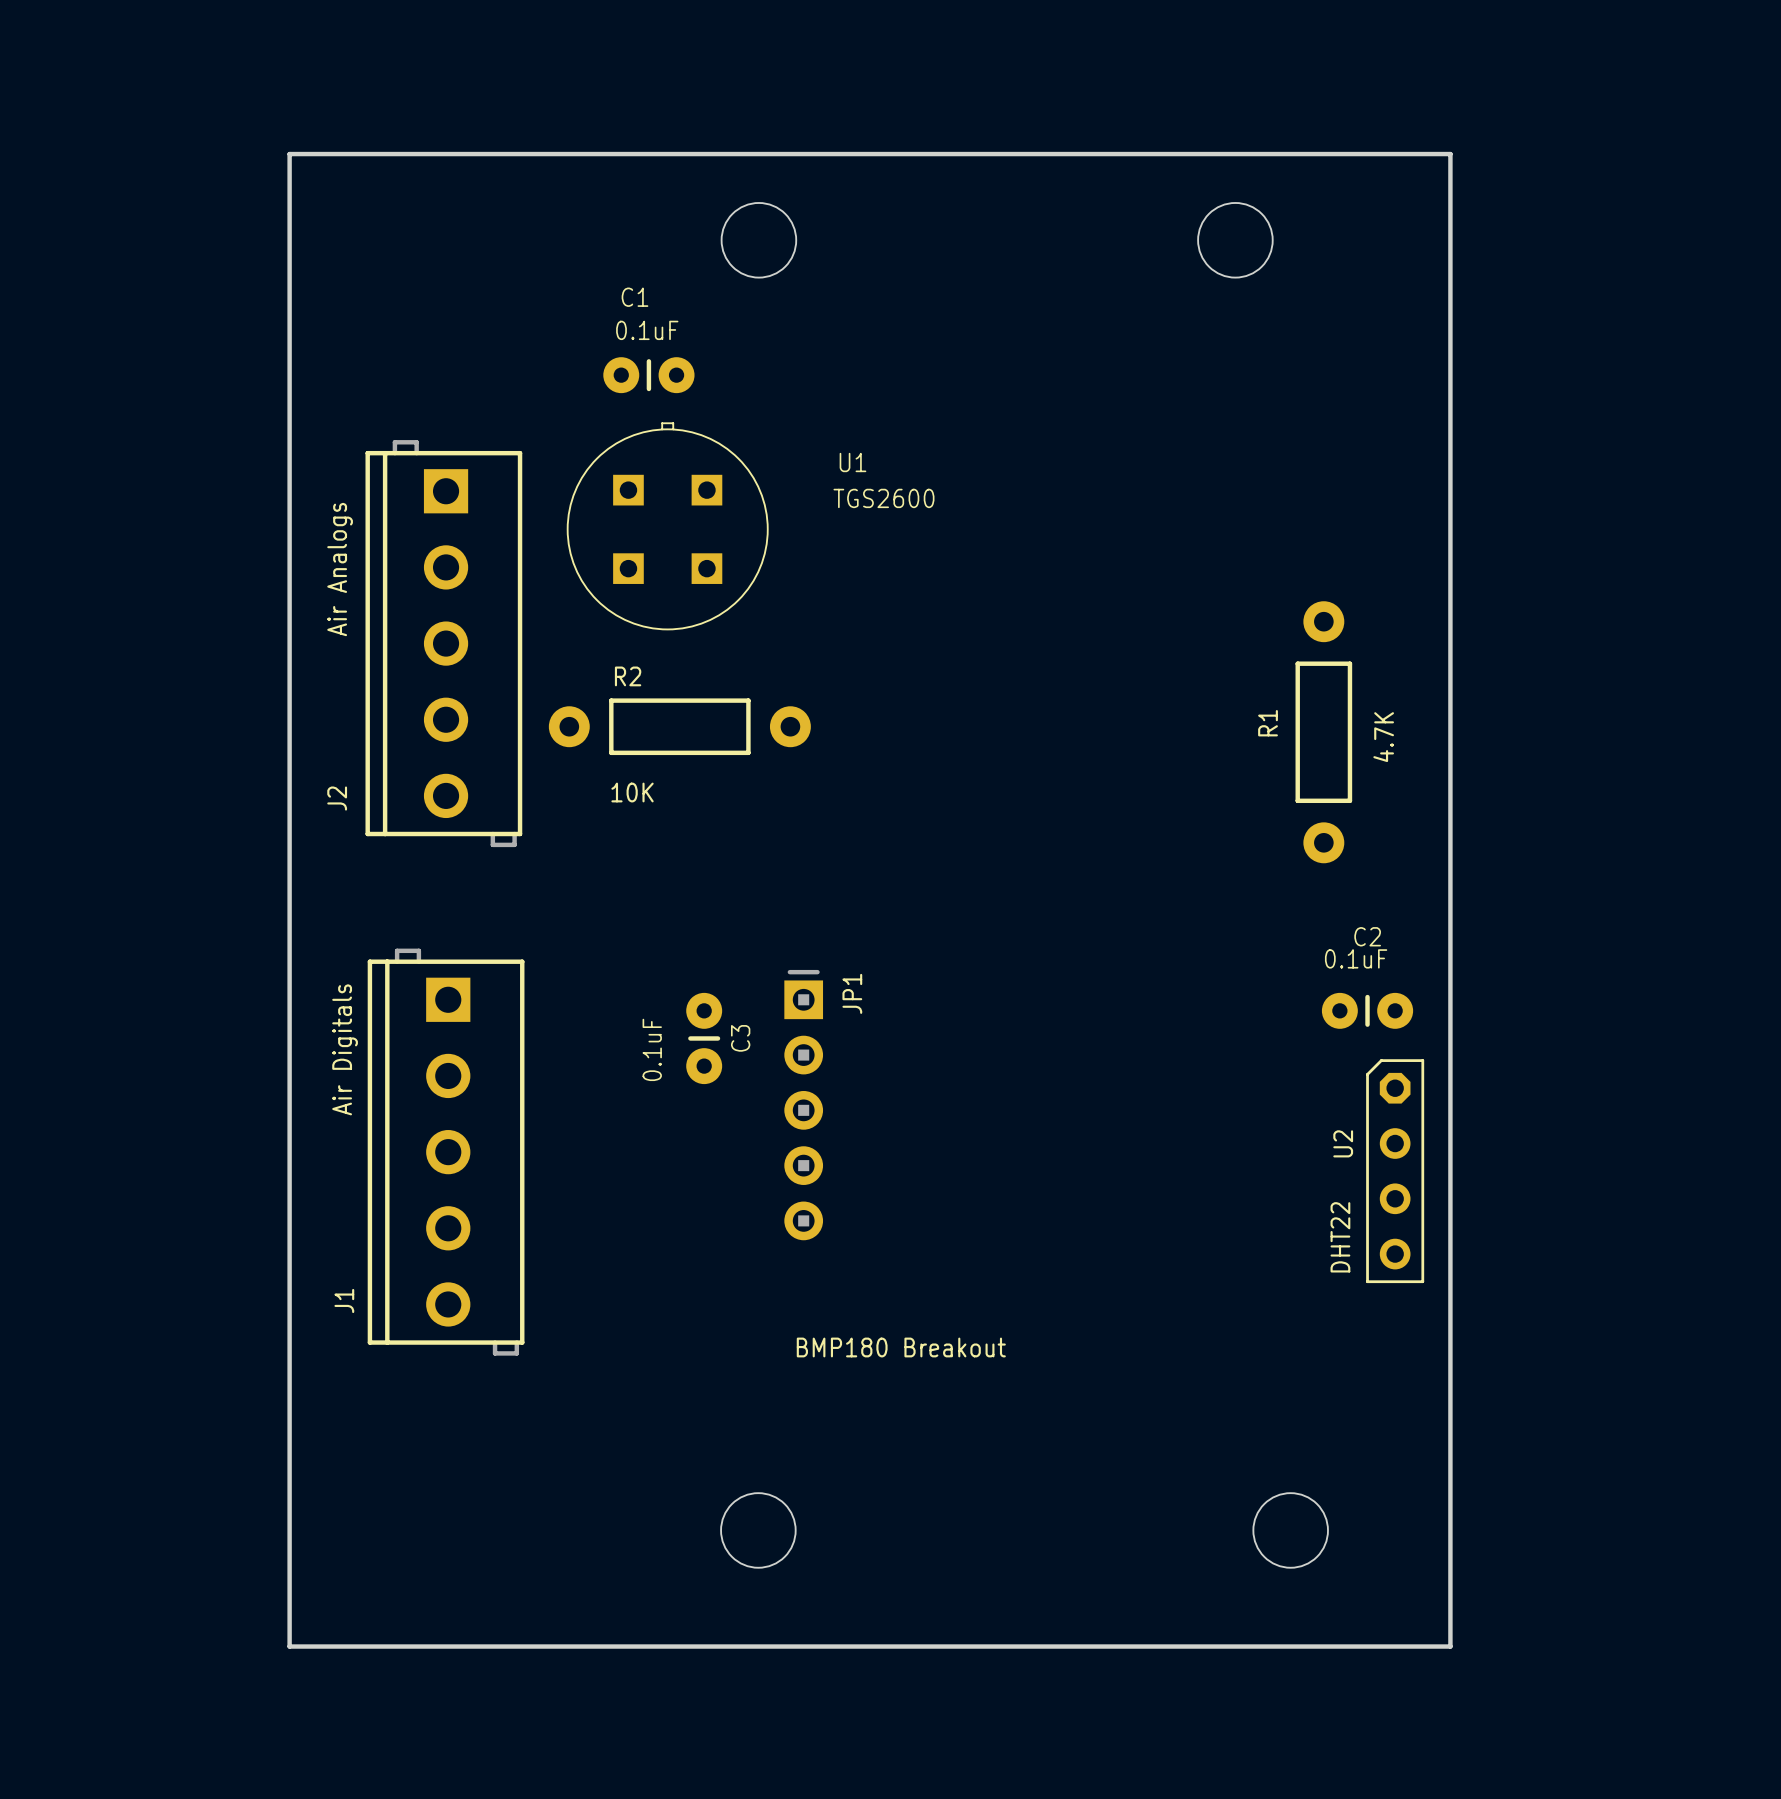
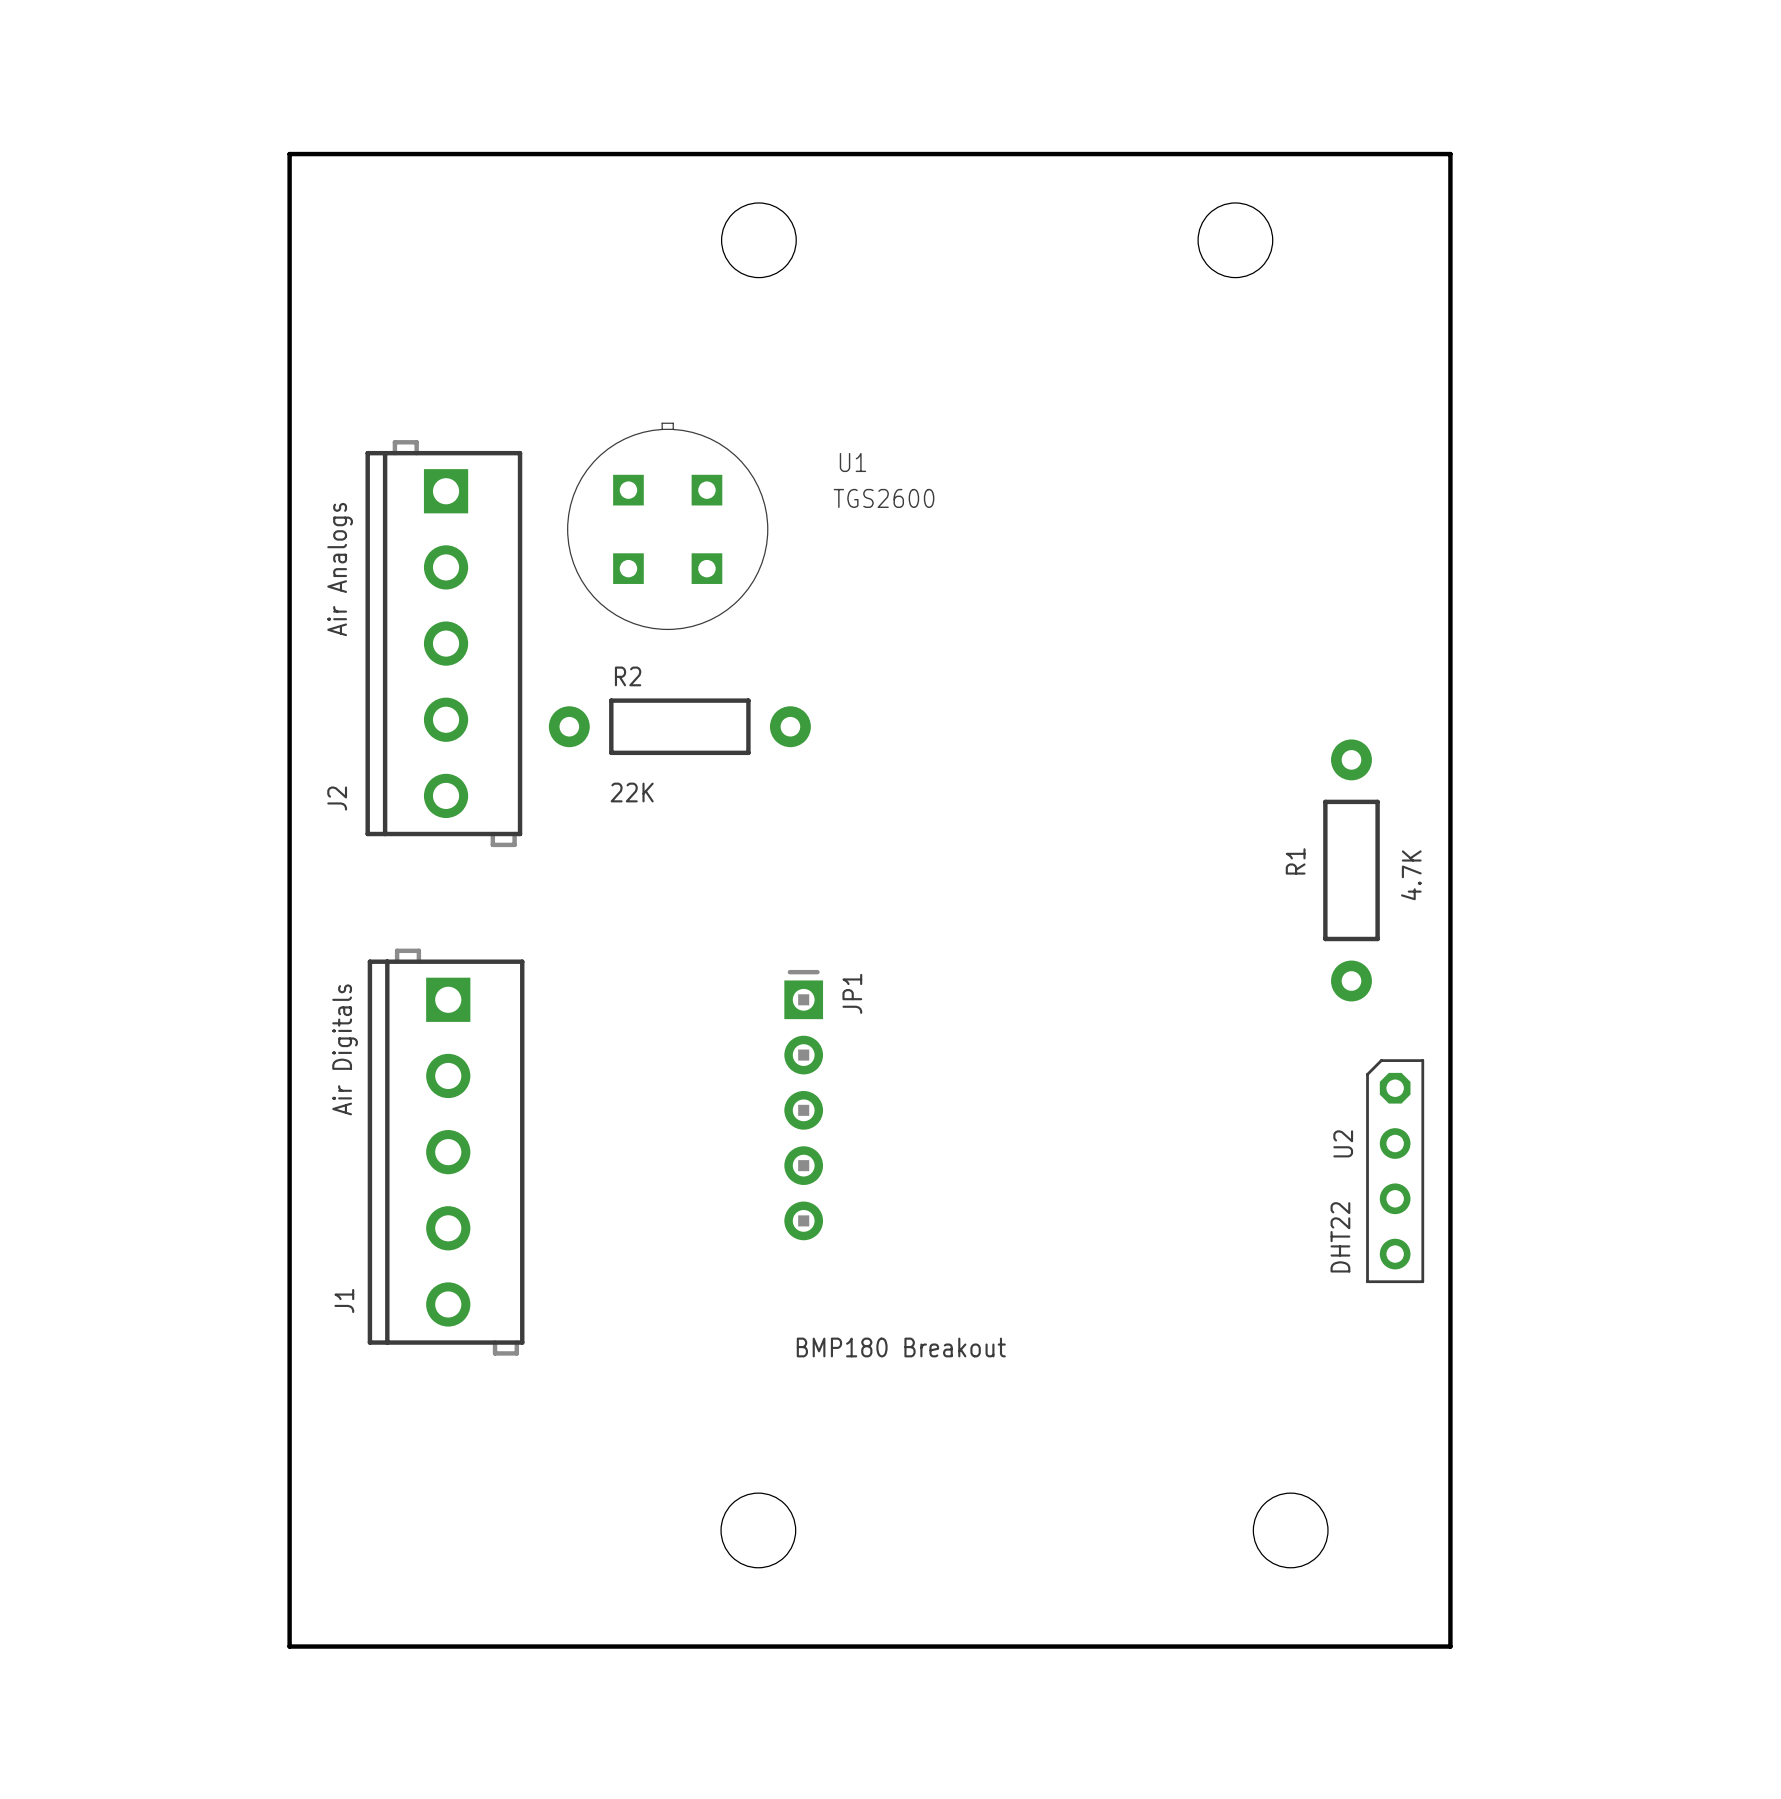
C1: 0.1uF (648, 375) -> none
R1 position: (1323, 732) -> (1351, 870)
R2 value: 10K (632, 792) -> 22K (632, 792)
C2: 0.1uF (1367, 1010) -> none
C3: 0.1uF (704, 1038) -> none

